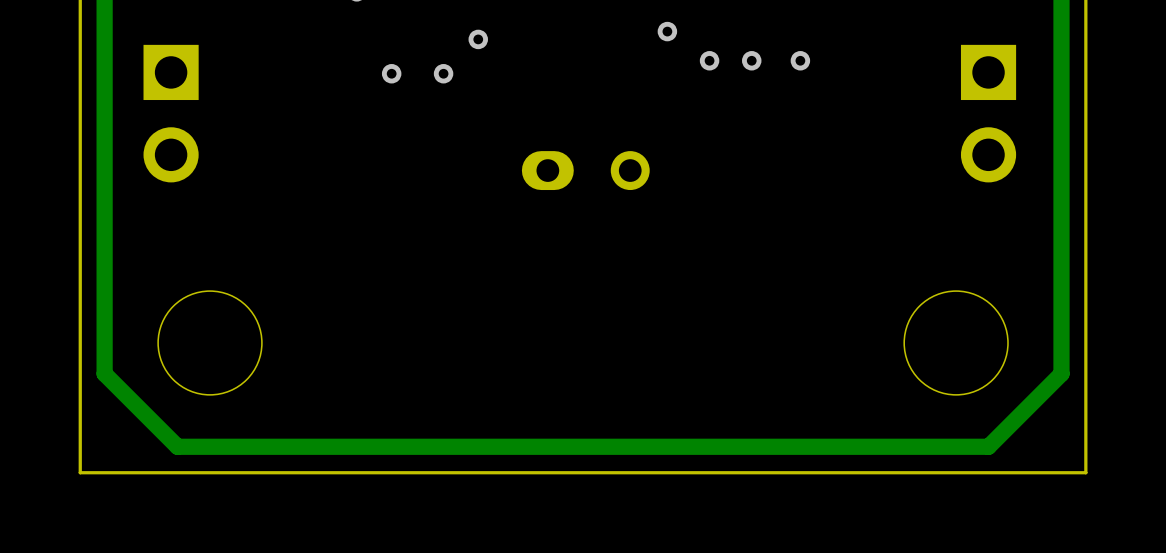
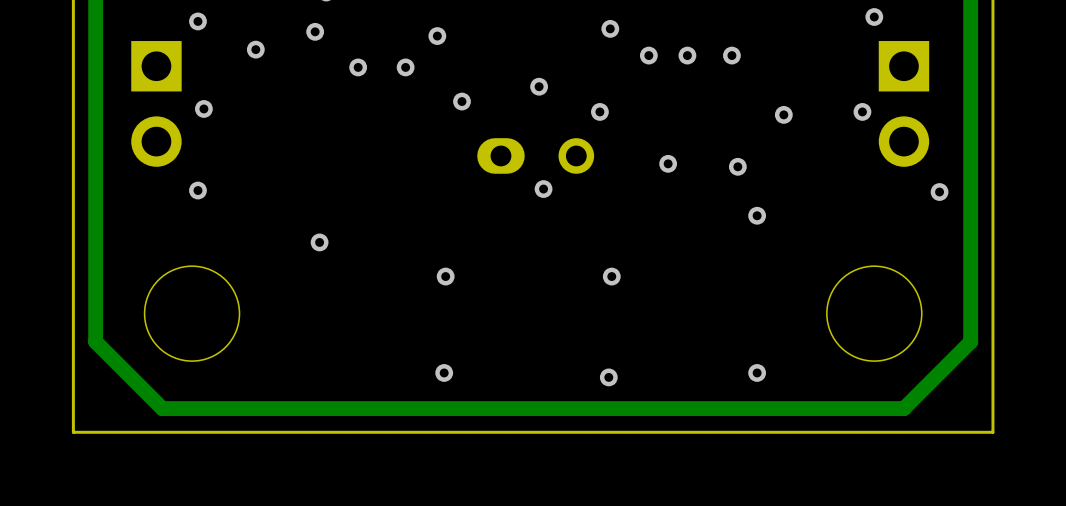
via: none -> (874, 17)
via: none -> (197, 21)
via: none -> (315, 31)
via: none -> (255, 49)
via: none -> (539, 86)
via: none -> (461, 101)
via: none -> (203, 108)
via: none -> (599, 111)
via: none -> (862, 111)
via: none -> (783, 114)
via: none -> (668, 163)
via: none -> (737, 166)
via: none -> (543, 189)
via: none -> (197, 190)
via: none -> (939, 192)
via: none -> (757, 215)
via: none -> (319, 242)
via: none -> (445, 276)
via: none -> (611, 276)
via: none -> (444, 372)
via: none -> (757, 372)
via: none -> (608, 377)

